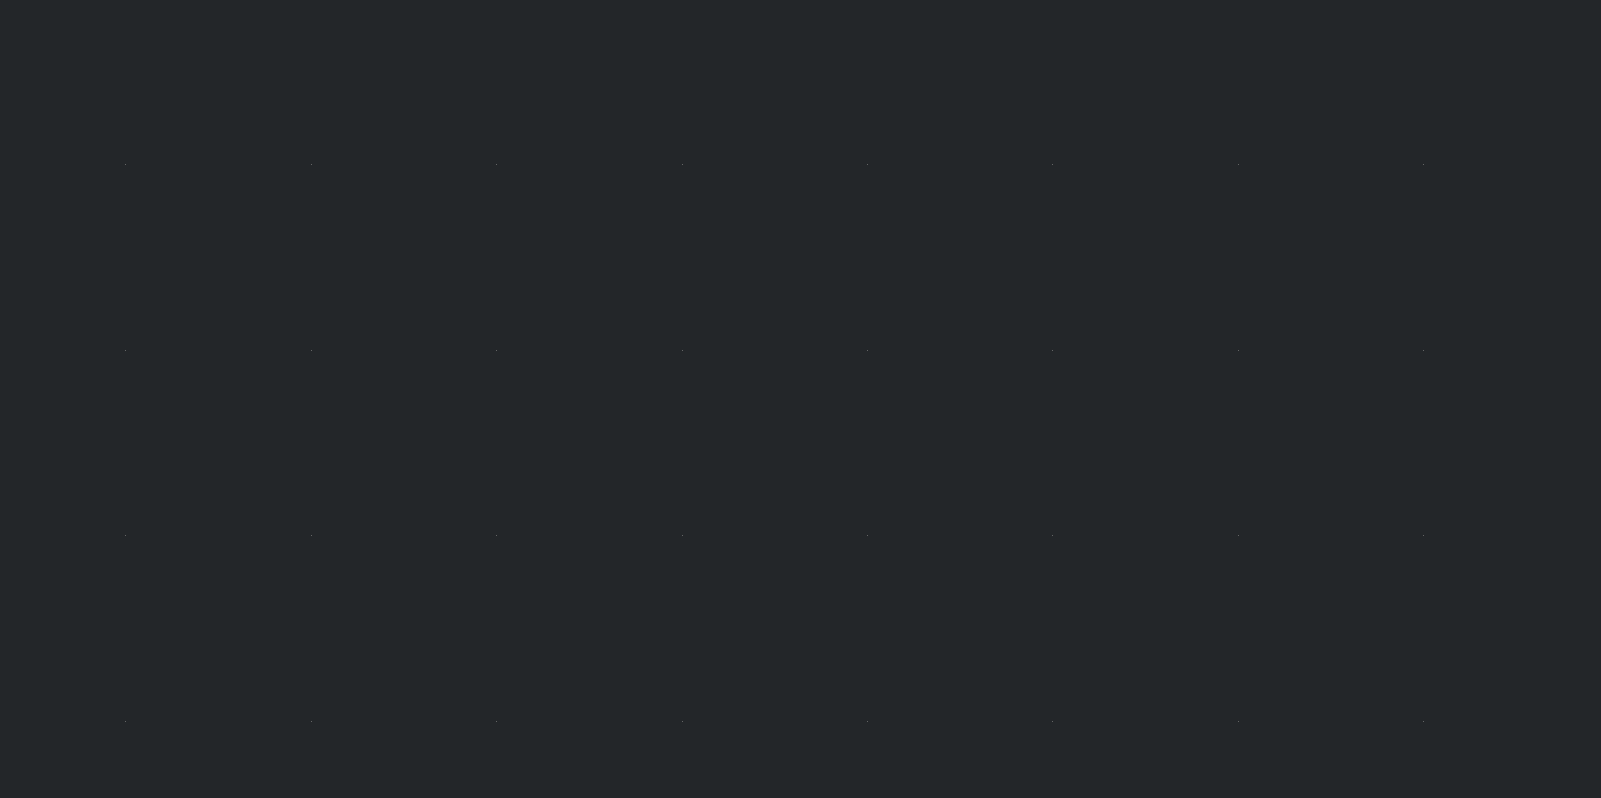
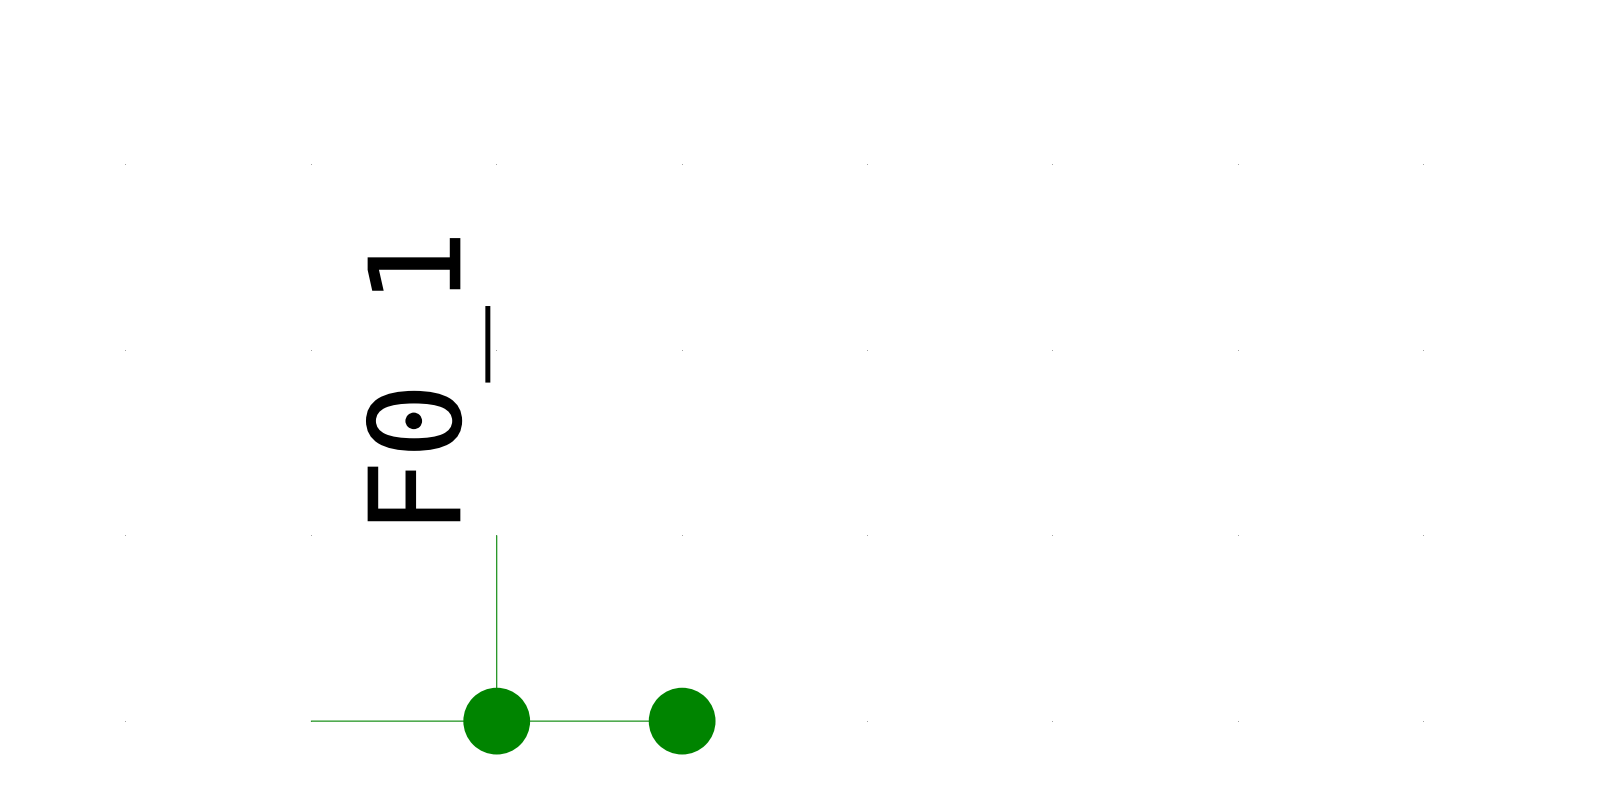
label: none -> F0_1 (428, 379)
wire: none -> (496, 535) (496, 721)
wire: none -> (311, 721) (682, 721)
junction: none -> (496, 721)
junction: none -> (682, 721)

